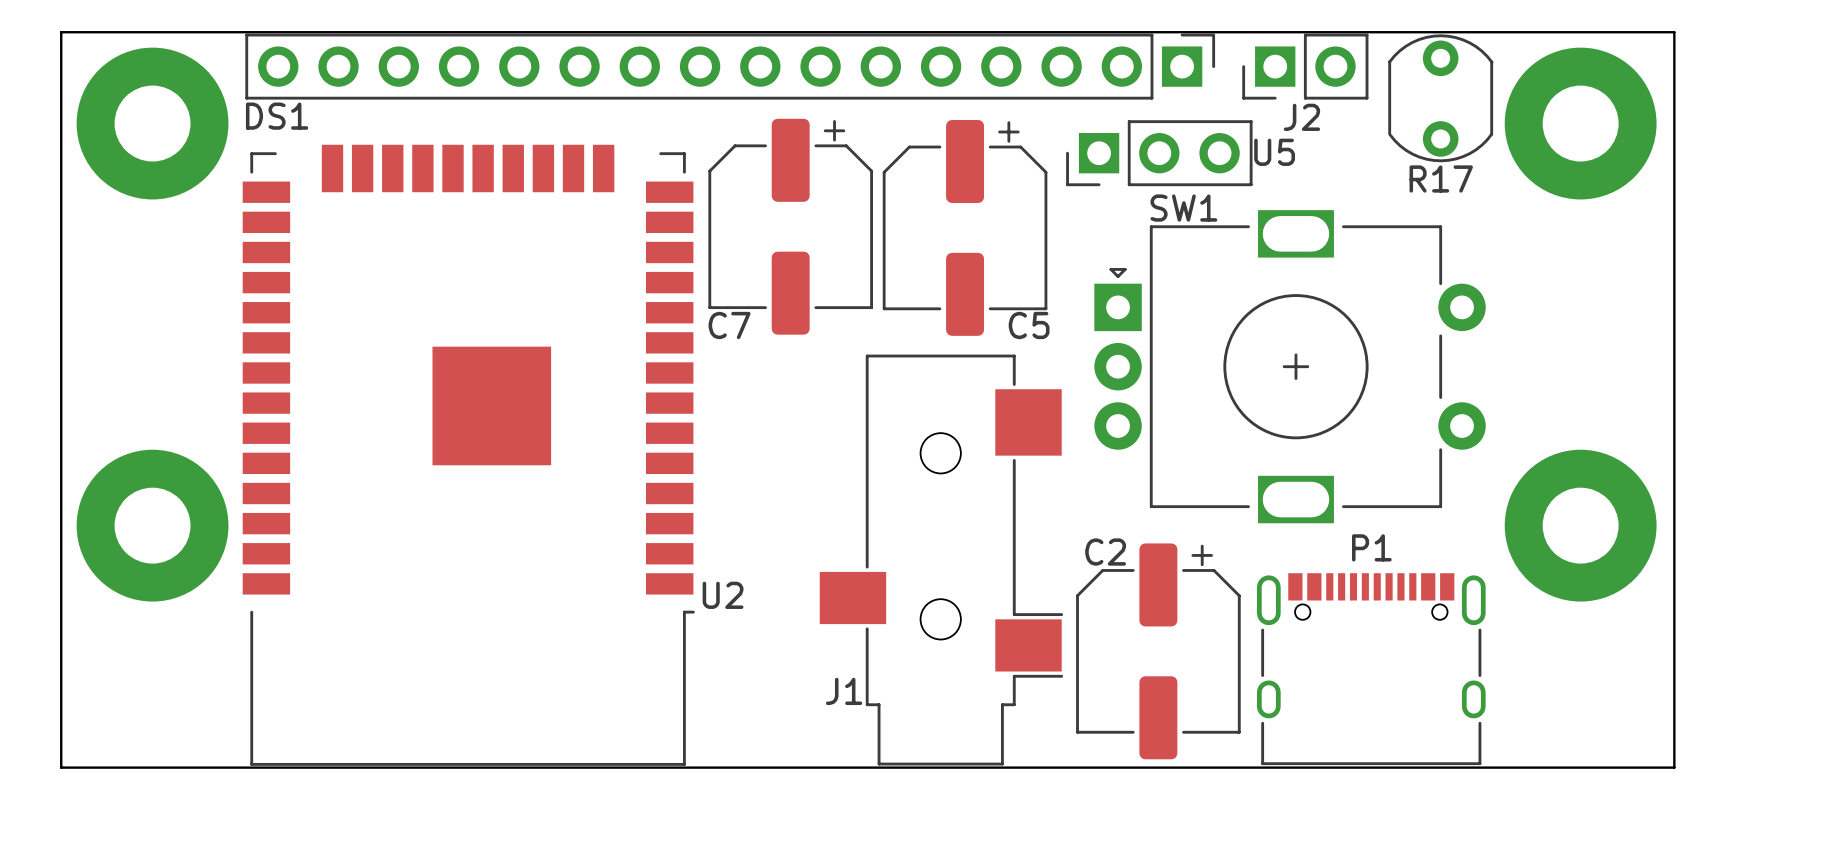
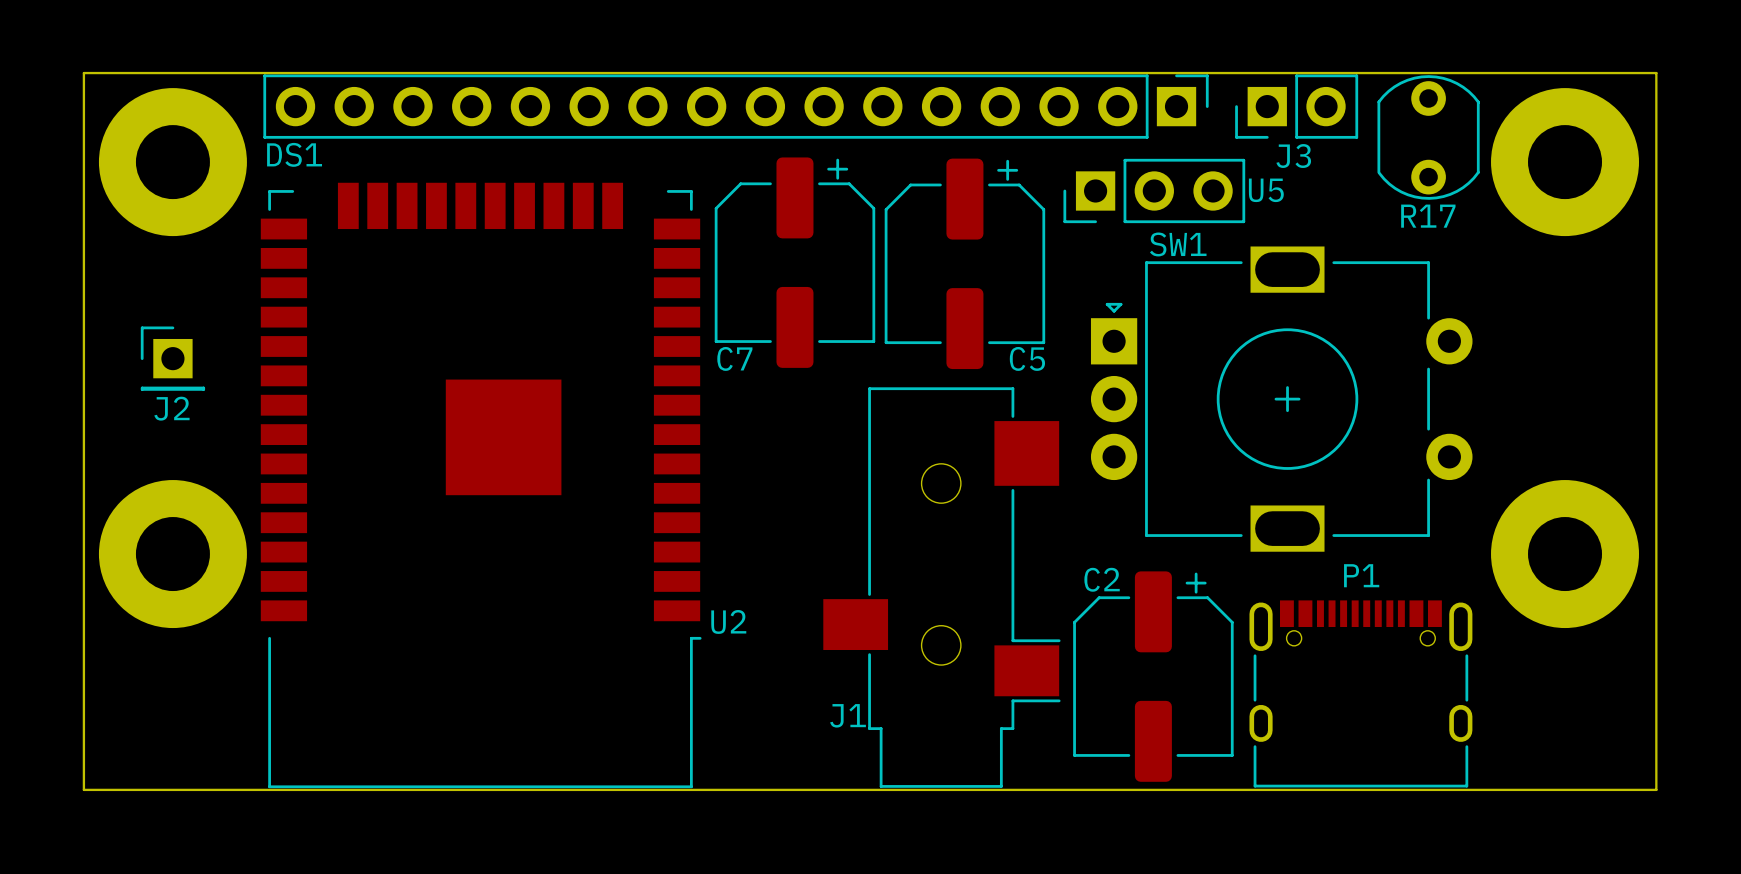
J2 name: J2 (1301, 117) -> J3 (1293, 156)
J2: none -> (172, 358)

